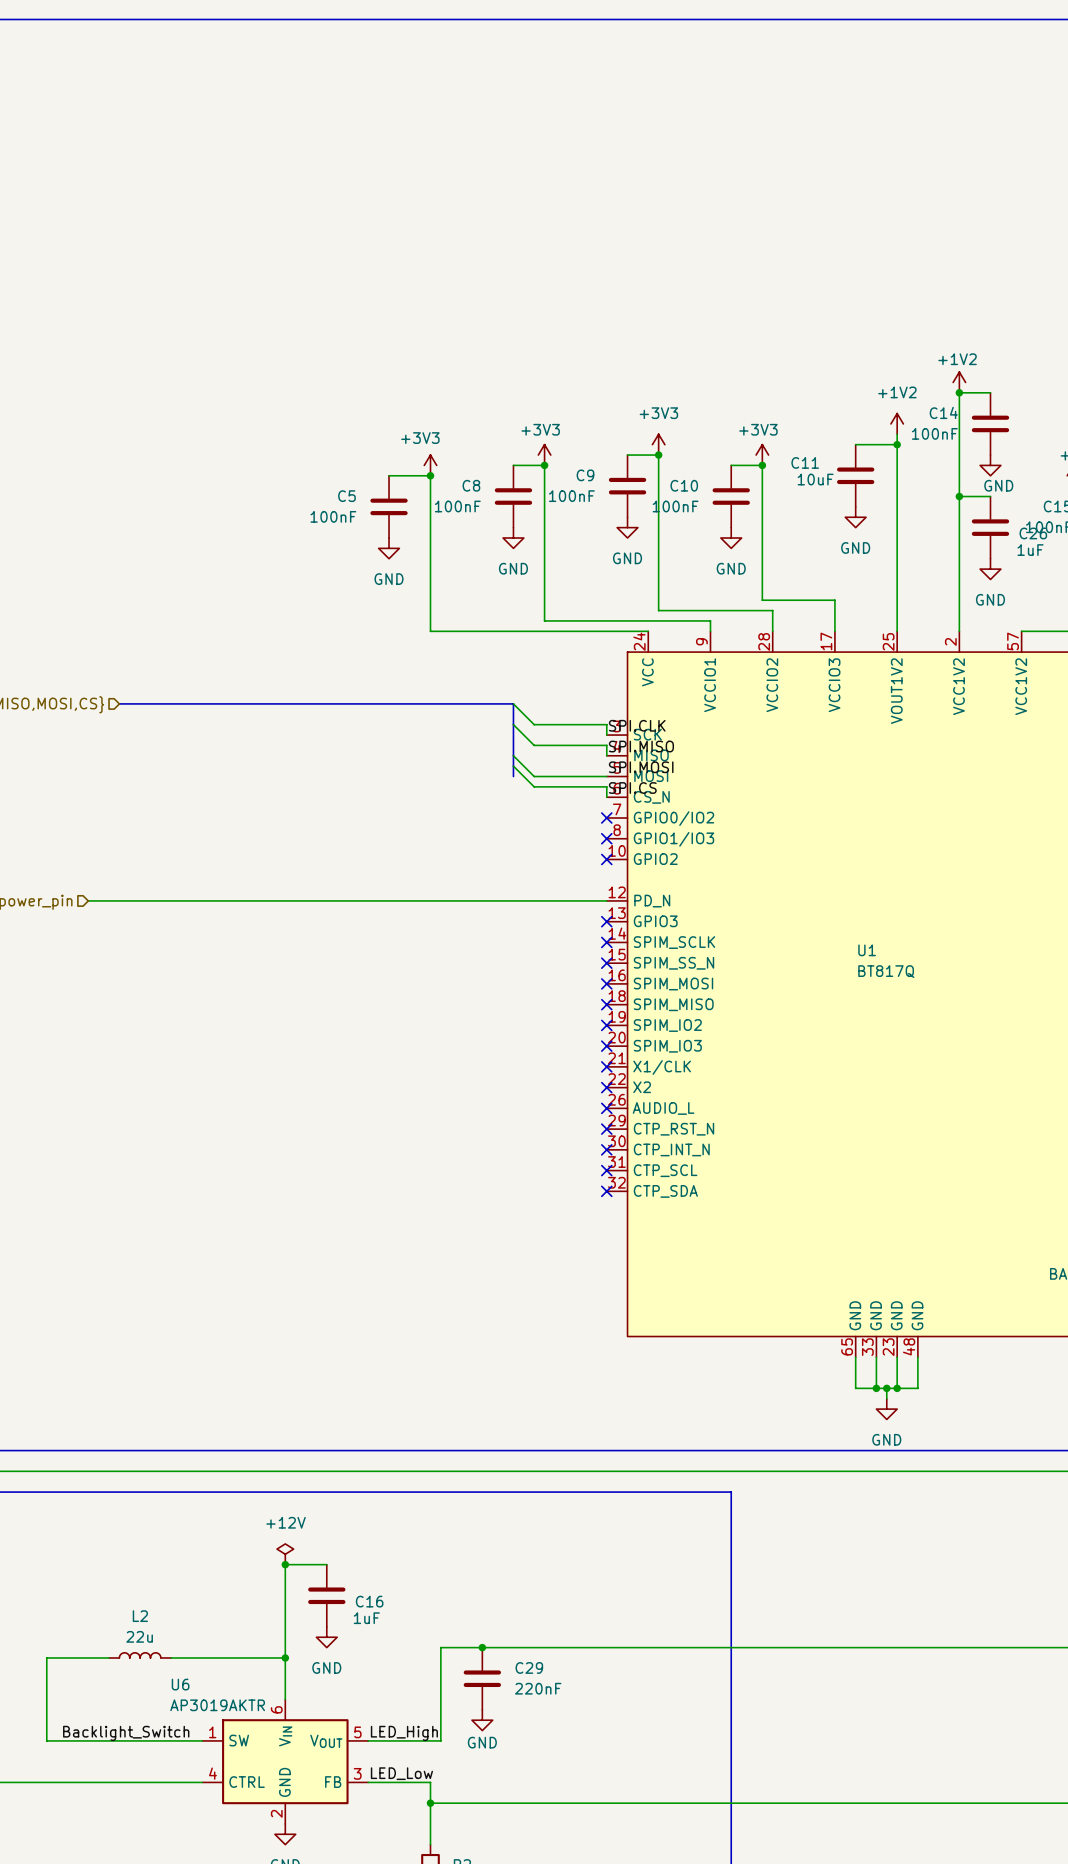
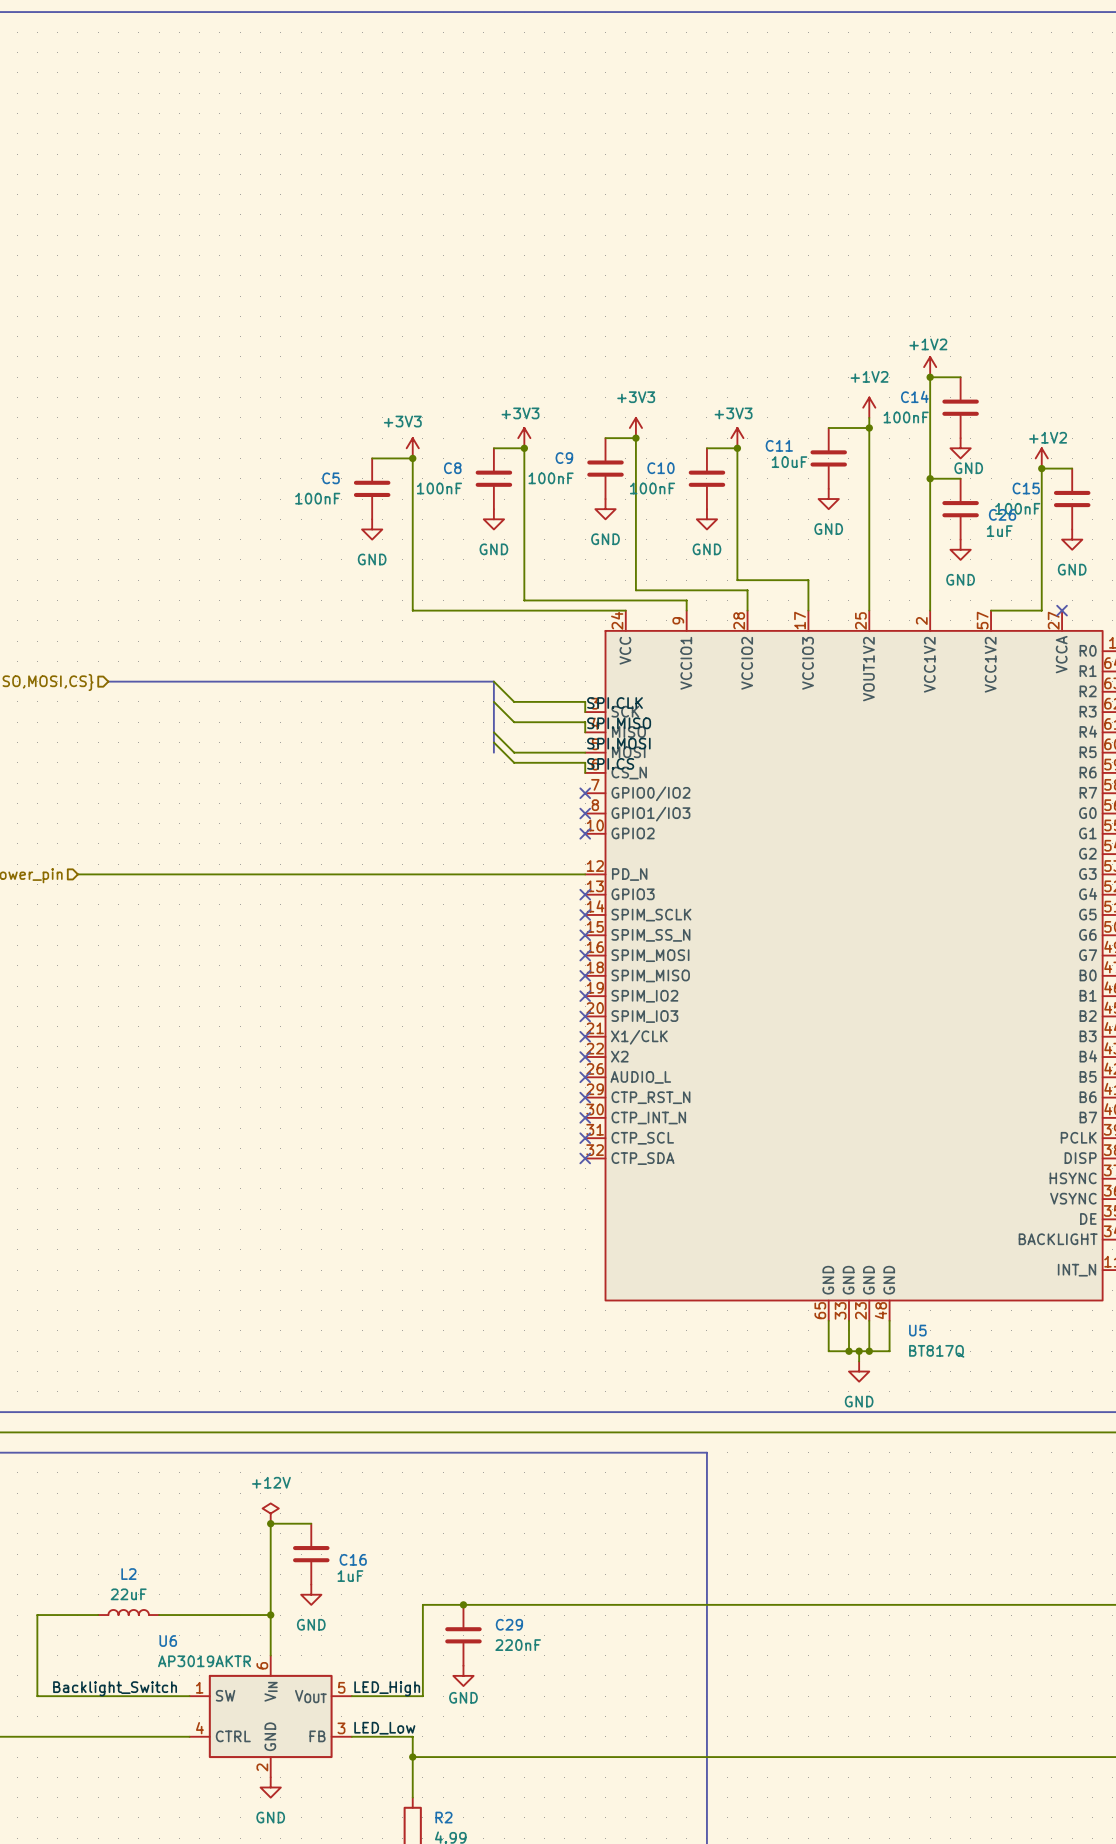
U1 name: U1 (867, 950) -> U5 (917, 1330)
U1 value position: BT817Q (886, 971) -> BT817Q (936, 1351)
L2 value: 22u (139, 1636) -> 22uF (128, 1594)

